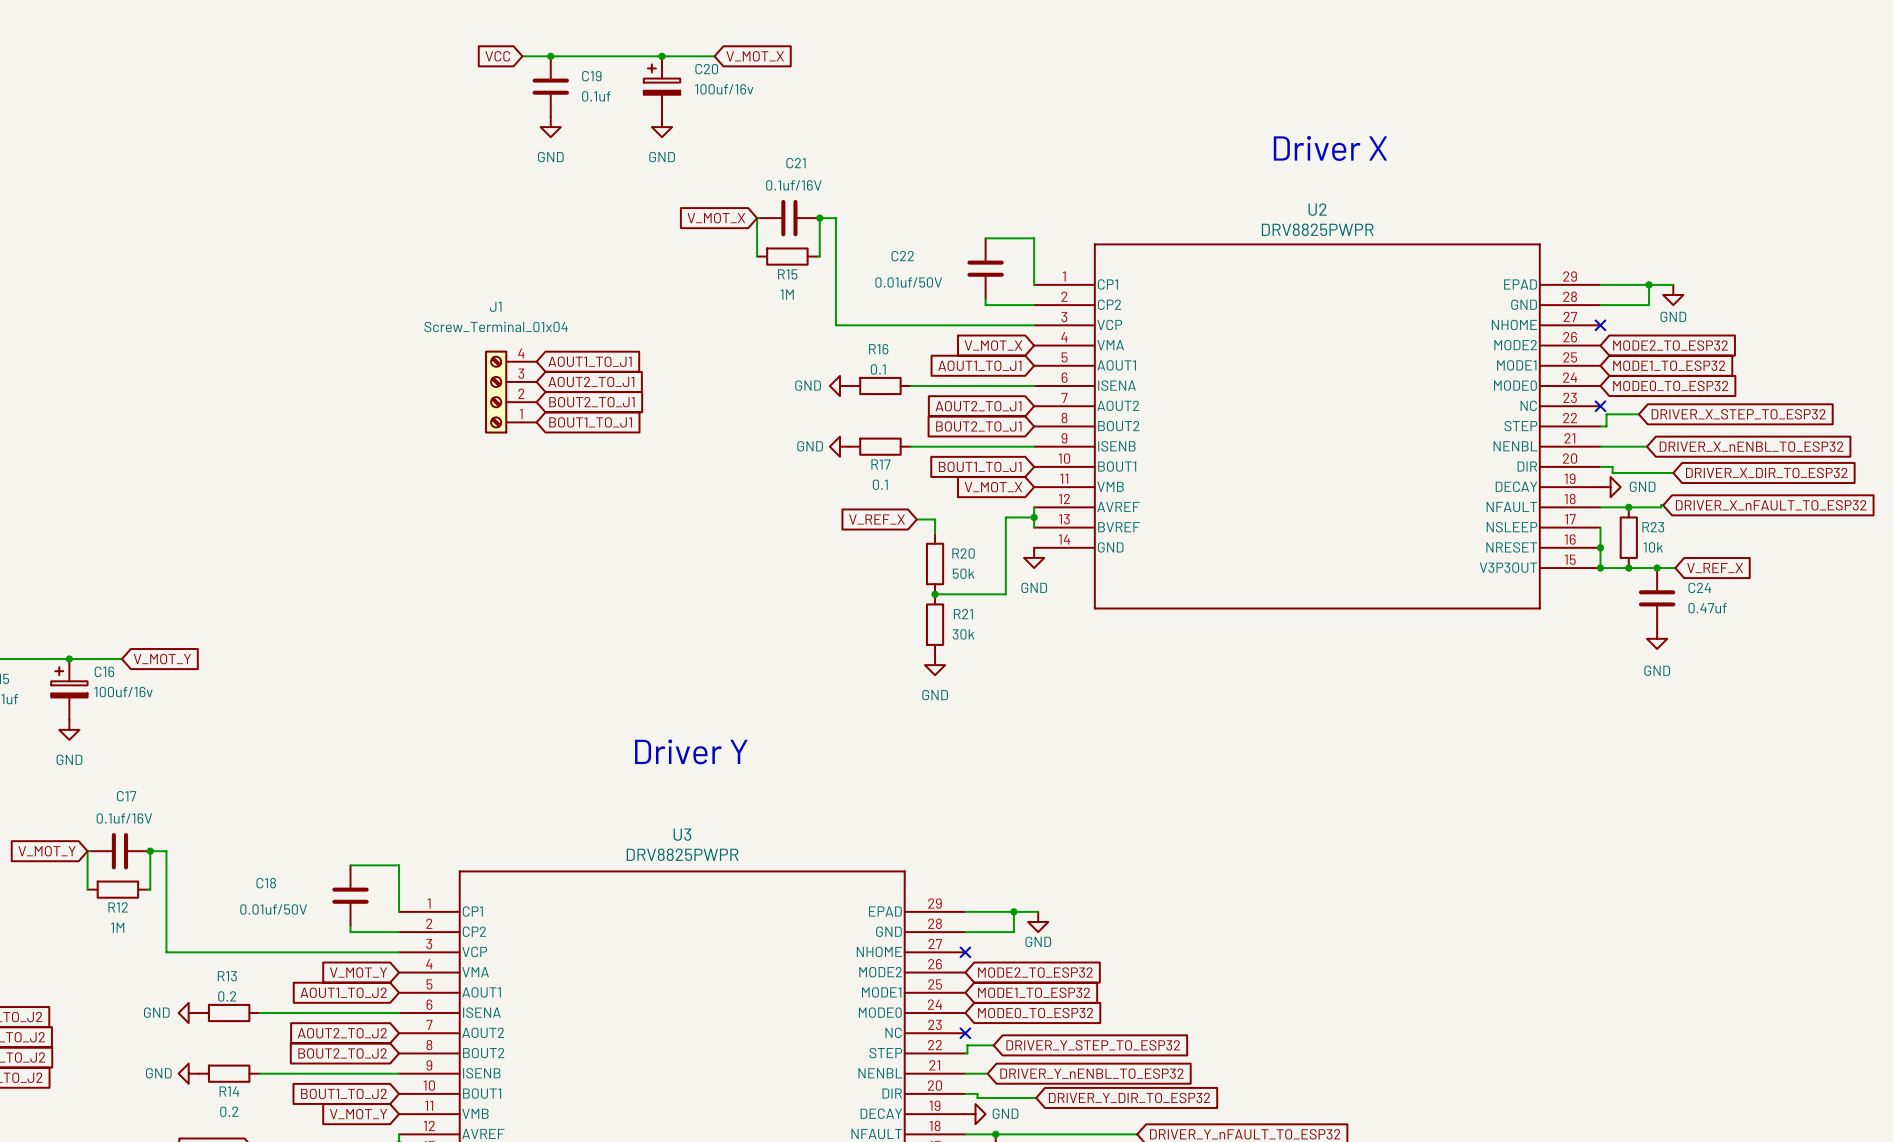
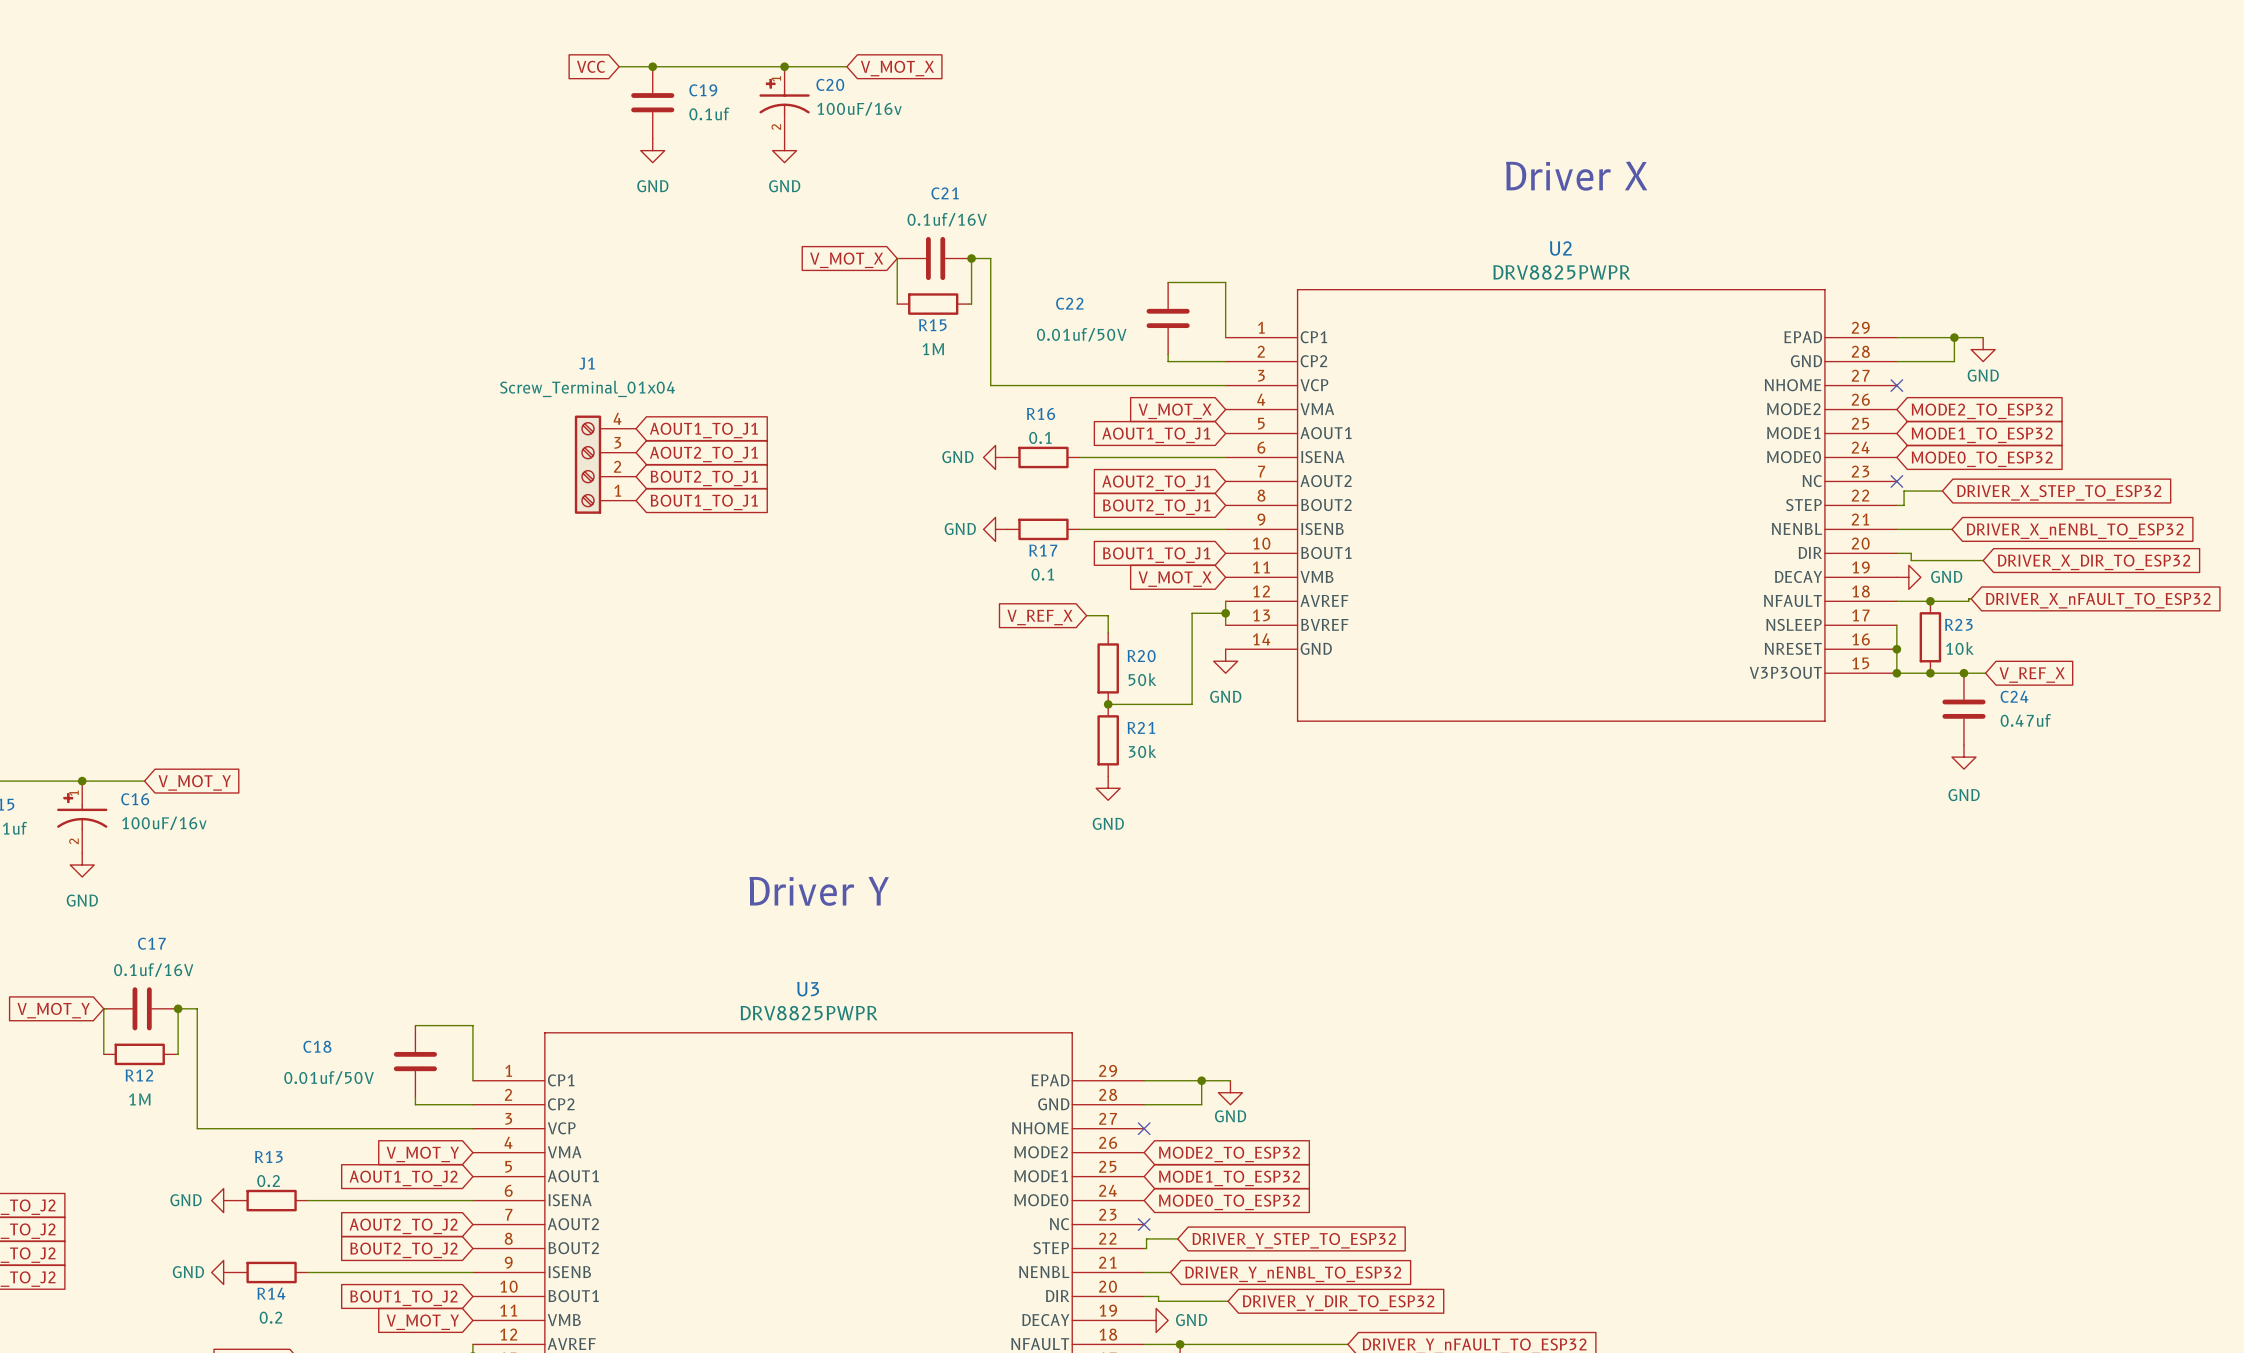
C20 symbol: [643, 56, 681, 117] -> [759, 66, 810, 139]
C20 value: 100uf/16v (724, 89) -> 100uF/16v (859, 108)
C16 symbol: [51, 659, 88, 720] -> [57, 781, 108, 854]
C16 value: 100uf/16v (123, 692) -> 100uF/16v (164, 823)

